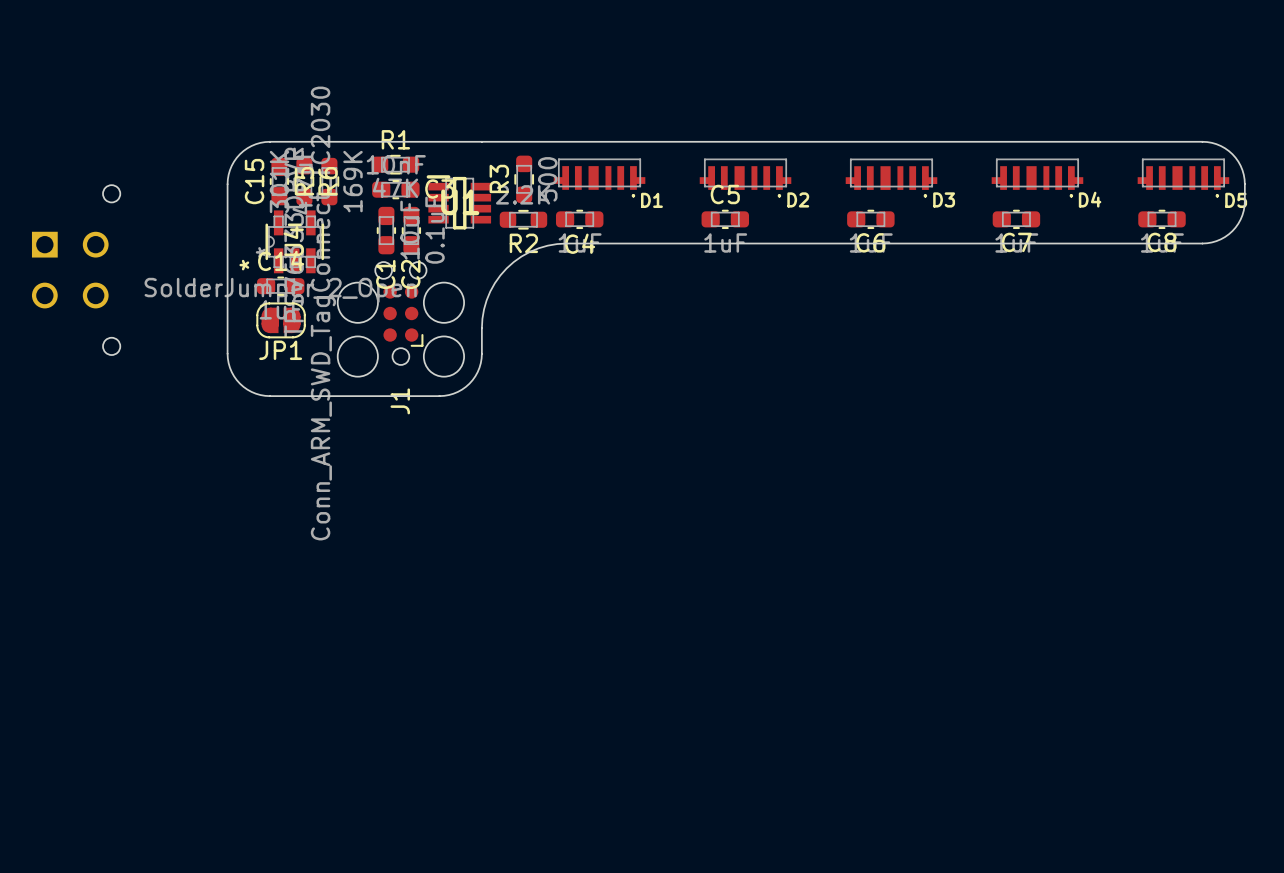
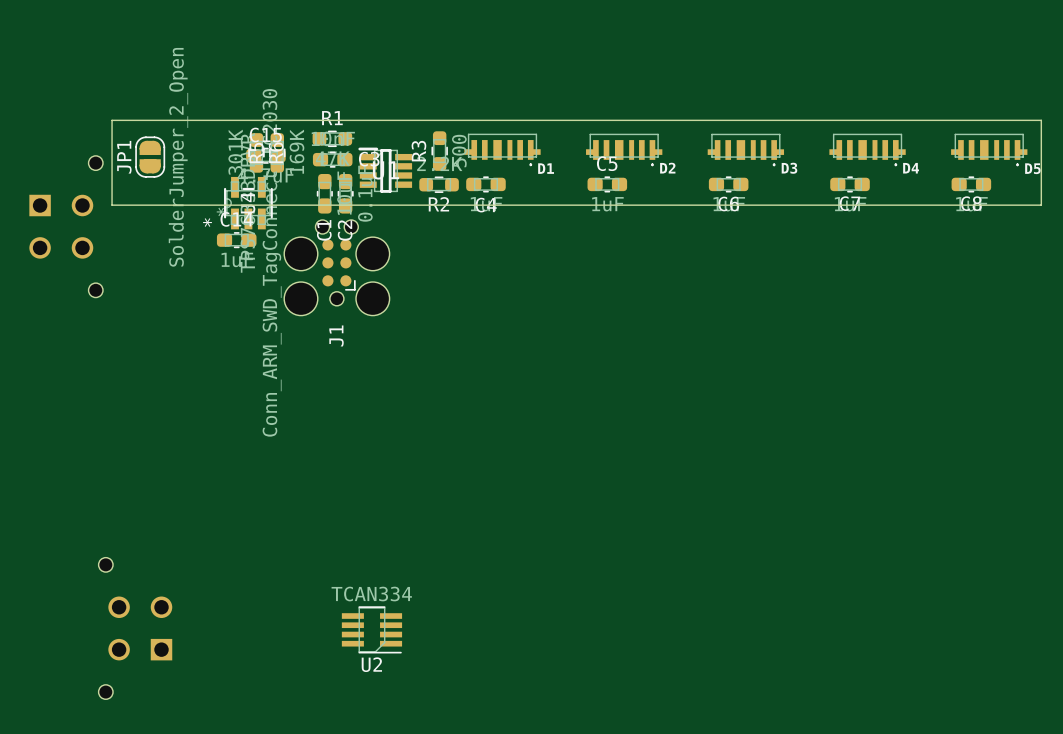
board edge: (269, 141) (1207, 142) (1225, 148) (1238, 161) (1244, 179) (1244, 205) (1240, 219) (1232, 231) (1220, 239) (1207, 243) (566, 243) (547, 245) (529, 251) (513, 262) (494, 283) (484, 309) (479, 367) (469, 383) (457, 391) (439, 396) (265, 395) (251, 391) (243, 386) (234, 376) (228, 363) (227, 184) (231, 165) (239, 154) (251, 145) (269, 141) -> none
board edge: none -> (112, 120) (112, 205) (1041, 205) (1041, 120) (112, 120)
C15 rotation: 0° (279, 181) -> 90° clockwise (265, 155)
C15 position: (279, 181) -> (265, 155)
JP1 rotation: 0° (281, 320) -> 90° clockwise (150, 157)
JP1 position: (281, 320) -> (150, 157)
part: none -> (135, 628)
U2: none -> TCAN334 (371, 629)

